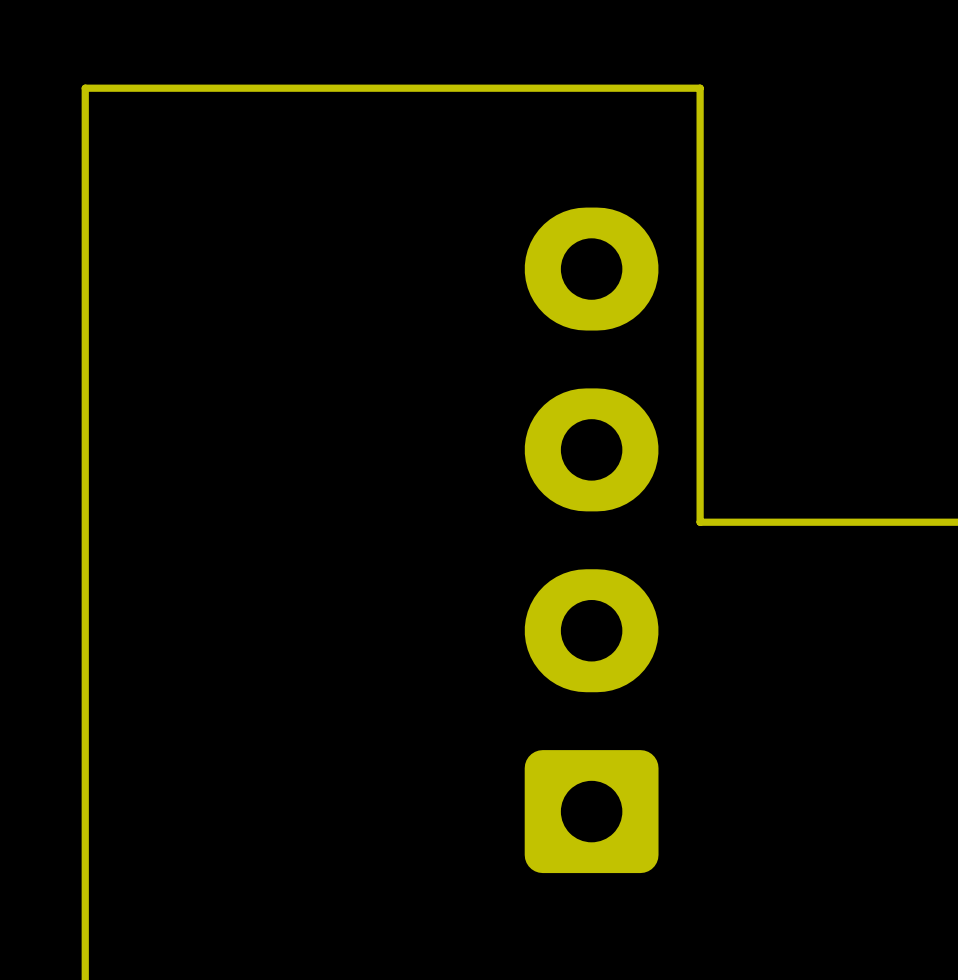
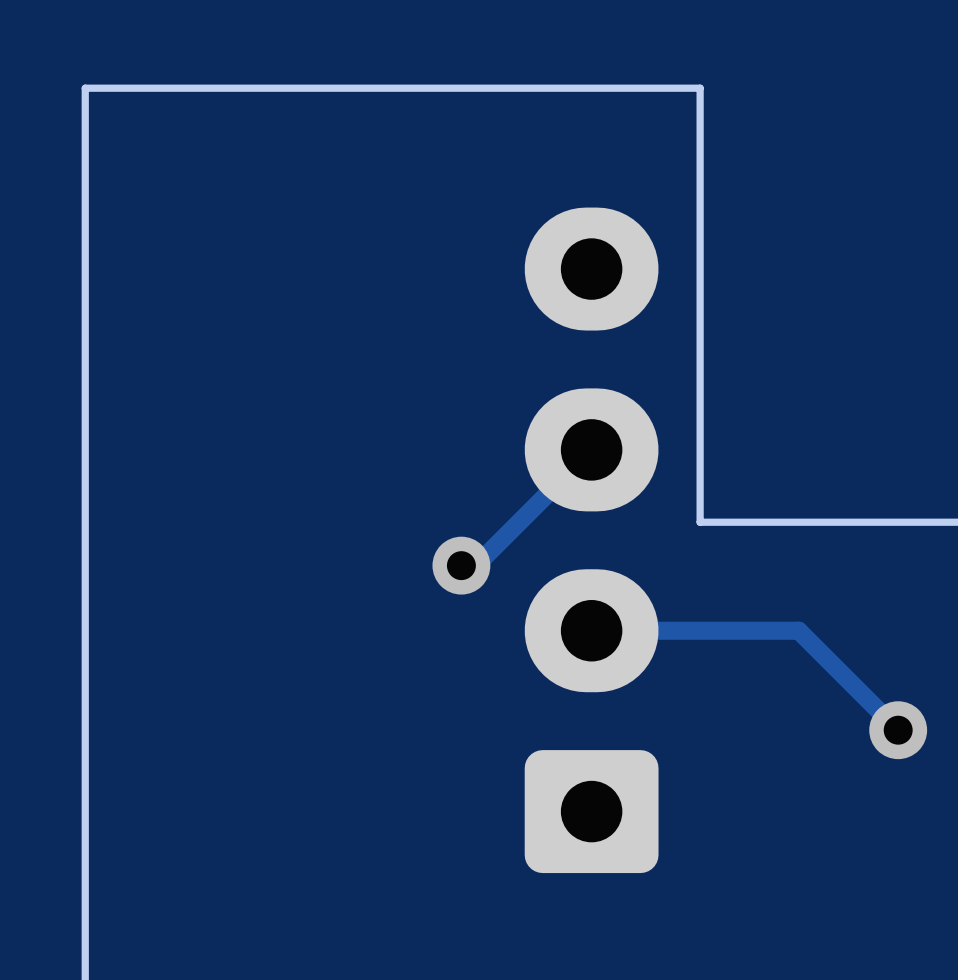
track: none -> (591, 449) (475, 565) (461, 565)
via: none -> (461, 565)
track: none -> (591, 630) (798, 630) (898, 730)
via: none -> (898, 730)

